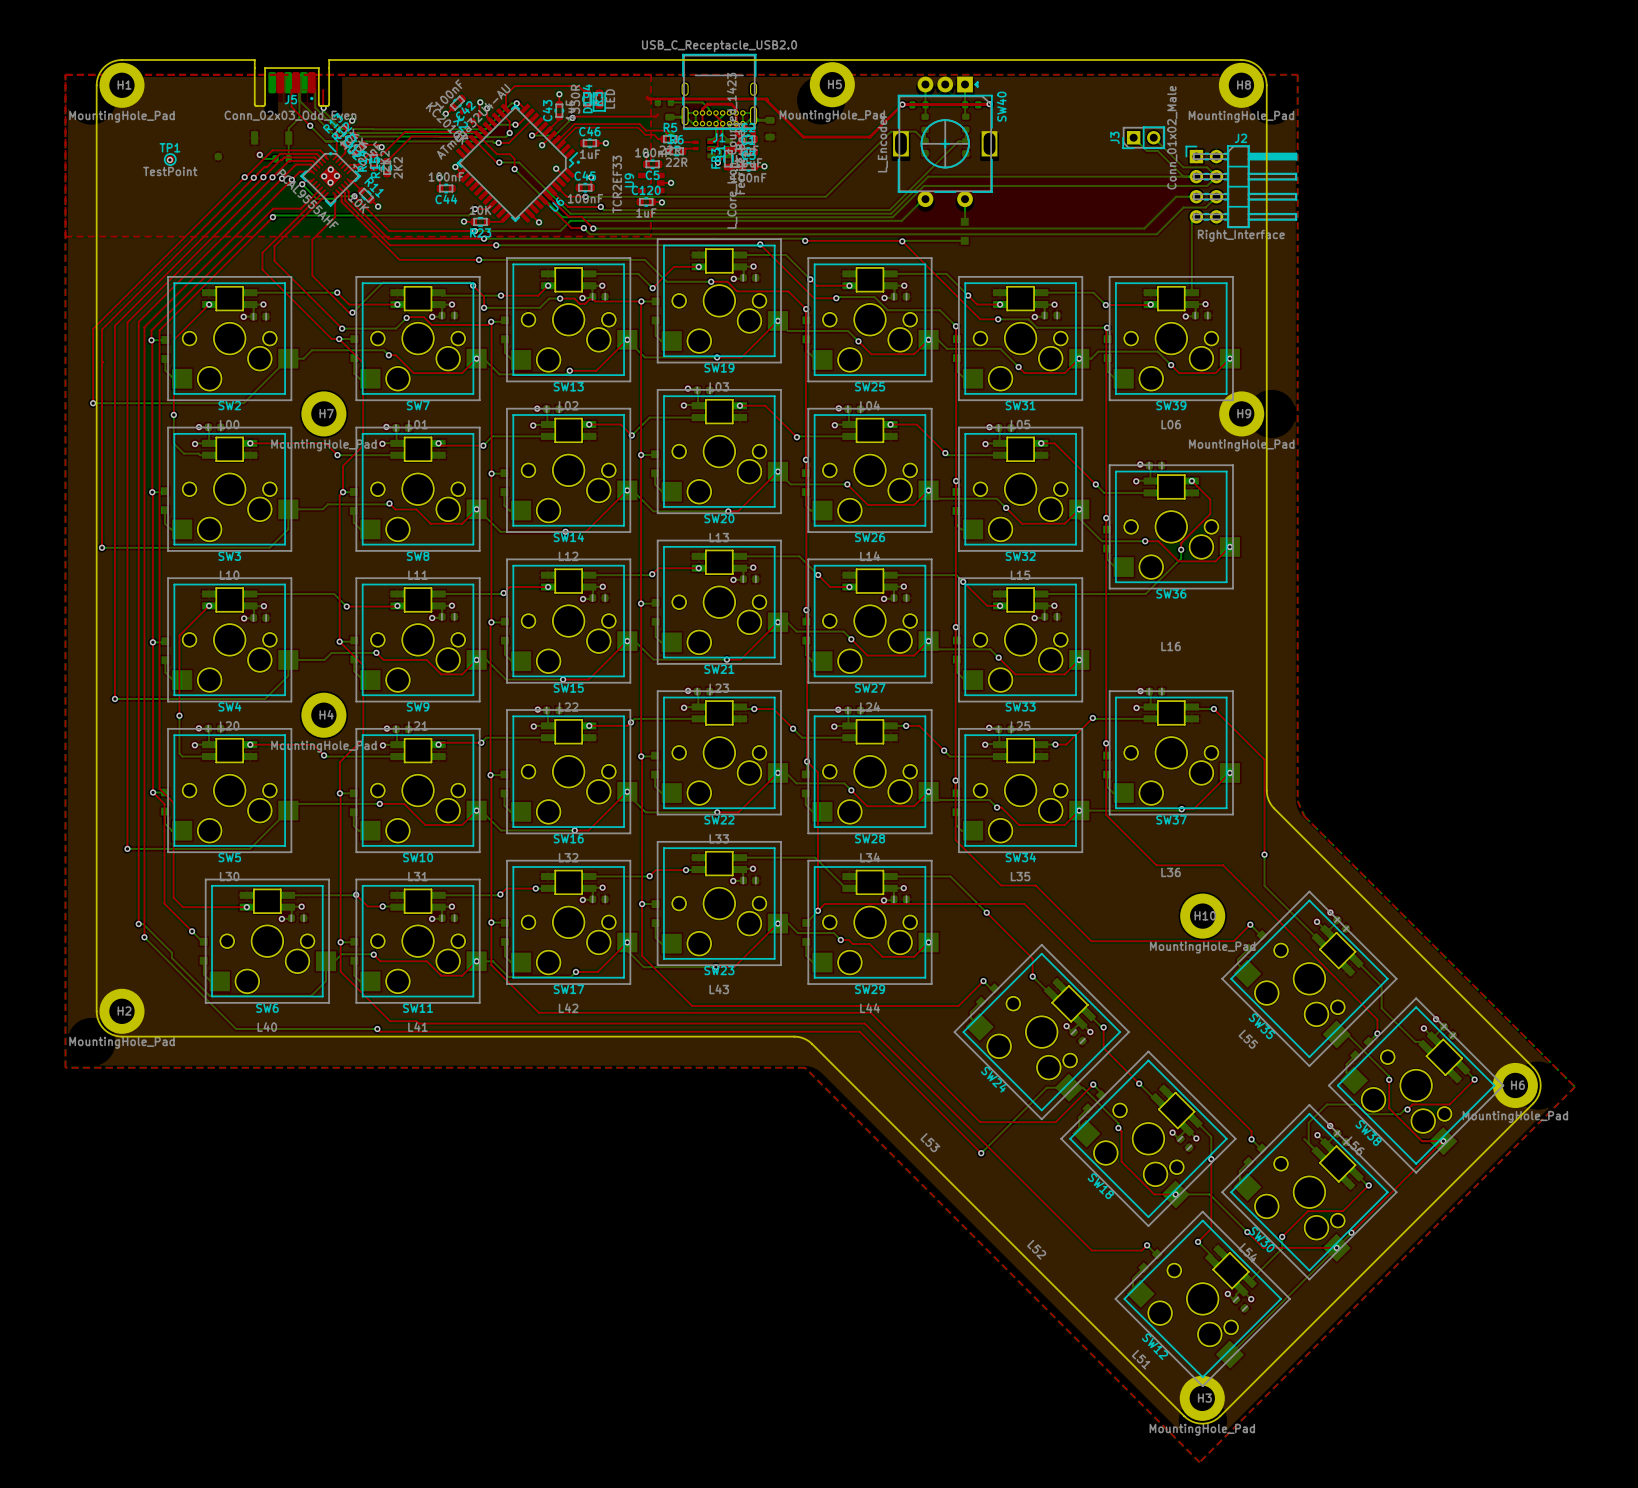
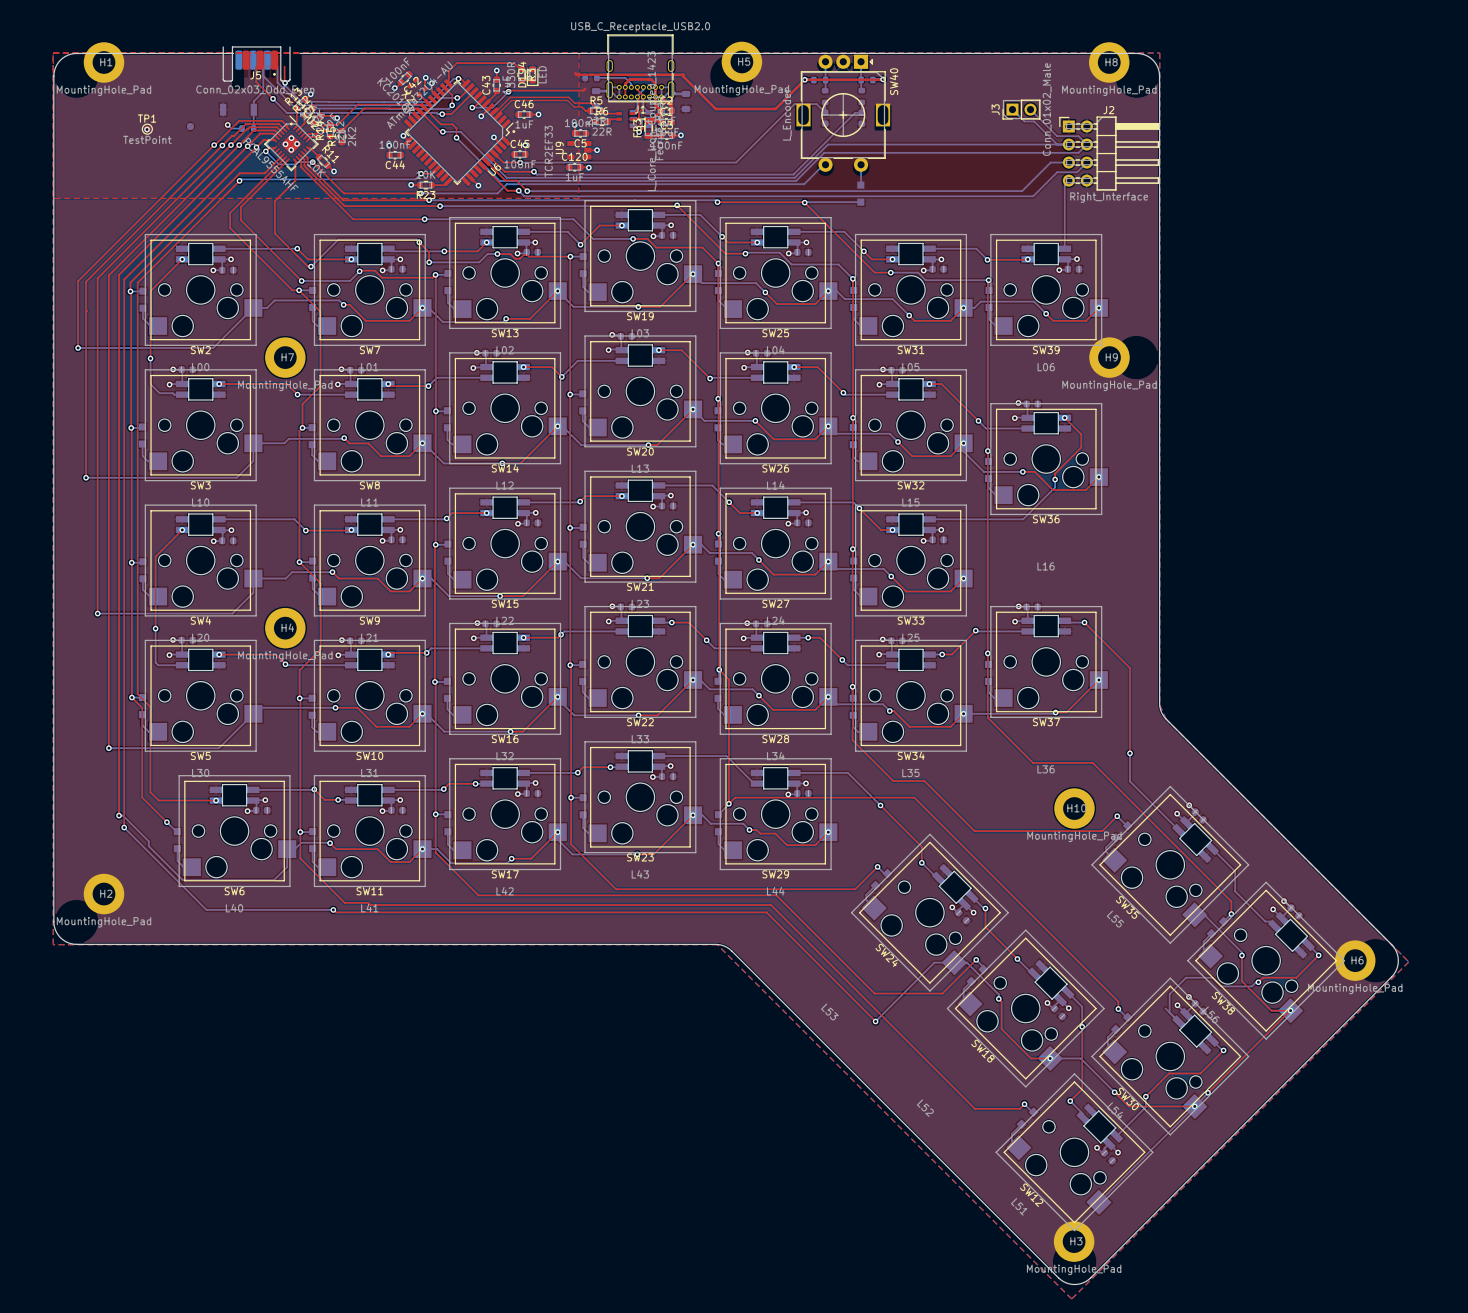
board edge: (254, 68) (254, 59) (118, 60) (104, 67) (96, 82) (96, 1011) (101, 1026) (109, 1033) (121, 1036) (794, 1036) (803, 1038) (812, 1044) (1184, 1416) (1198, 1423) (1214, 1420) (1533, 1103) (1538, 1095) (1540, 1085) (1538, 1075) (1533, 1067) (1274, 808) (1267, 797) (1266, 85) (1263, 72) (1254, 63) (1241, 59) (329, 59) (329, 68) -> none
board edge: none -> (233, 53) (73, 53) (62, 58) (54, 70) (53, 921)
board edge: none -> (300, 53) (1136, 53) (1150, 58) (1156, 64) (1159, 76) (1160, 709) (1166, 719) (1391, 944) (1397, 954) (1397, 966) (1391, 976) (1090, 1277) (1083, 1282) (1074, 1284) (1065, 1282) (1058, 1277) (731, 951) (724, 946) (715, 944) (76, 944) (67, 942) (60, 937) (55, 930) (53, 921)

